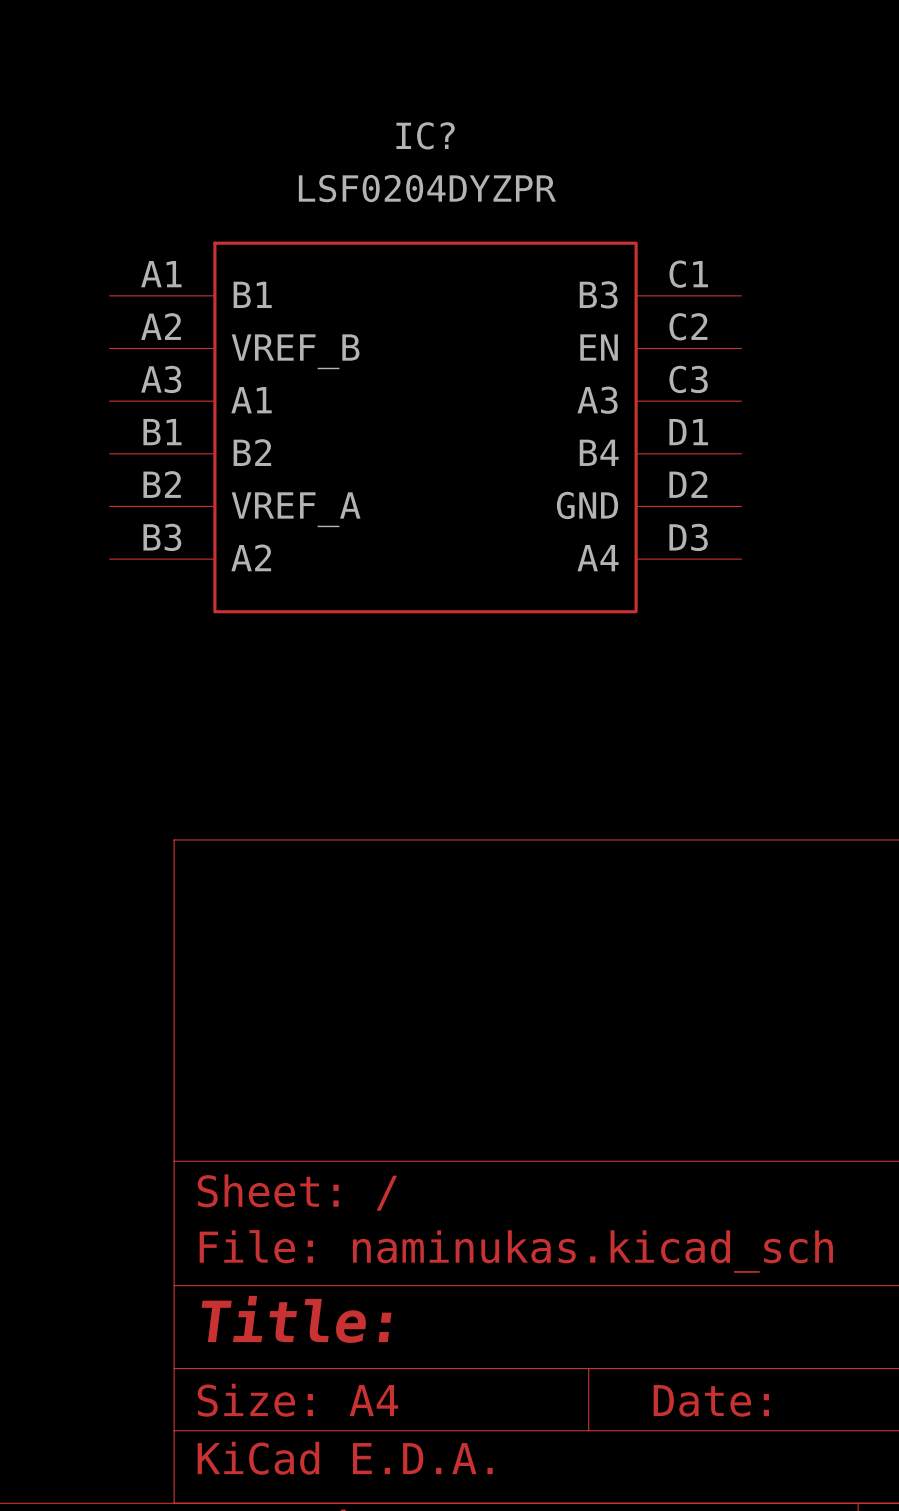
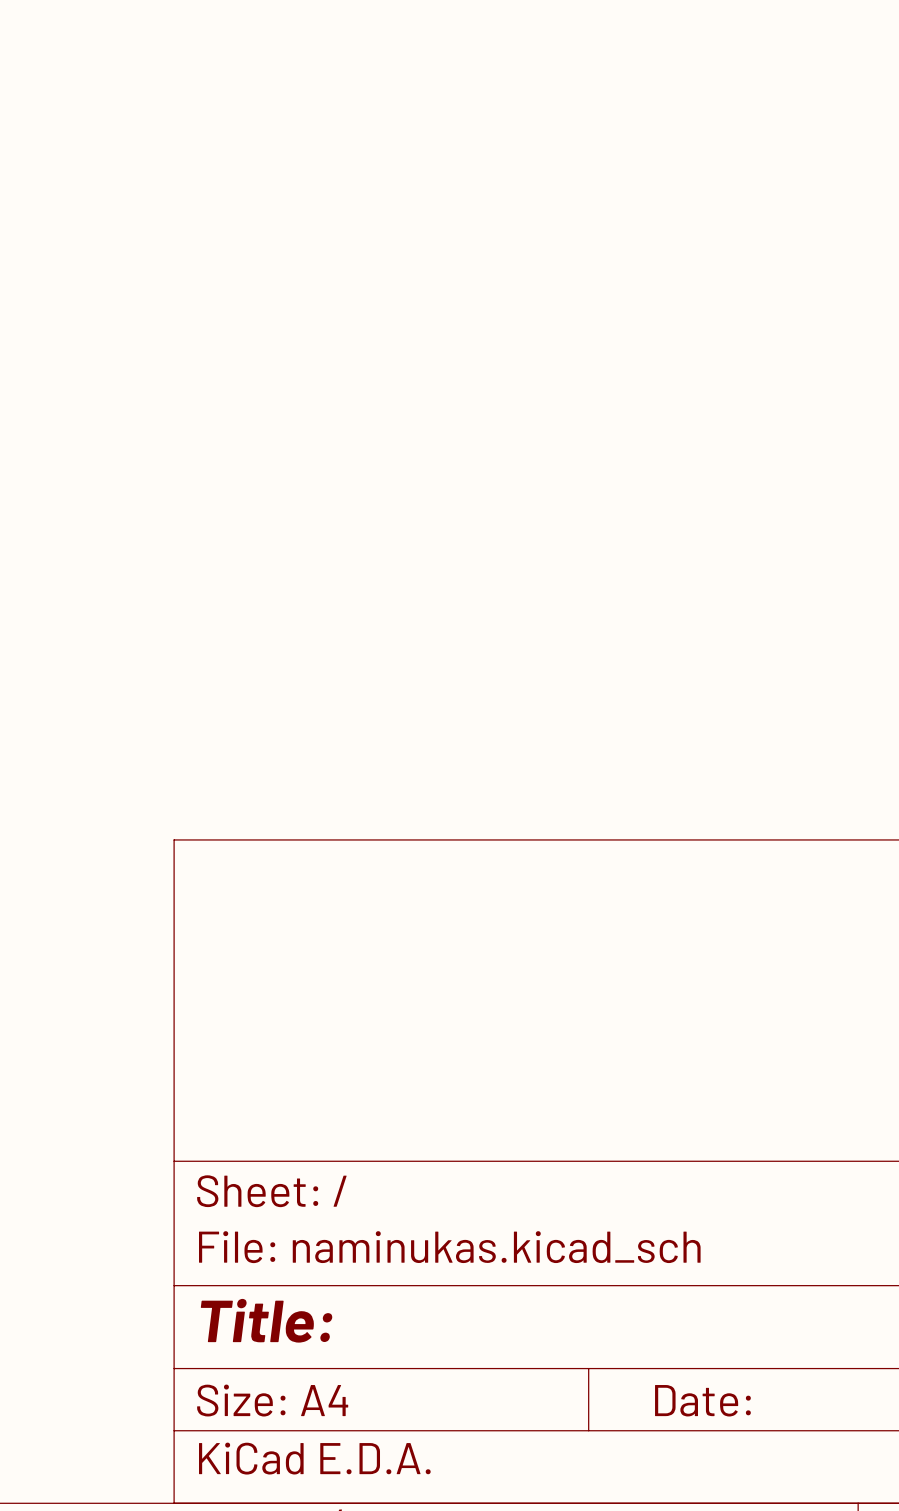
IC?: LSF0204DYZPR (425, 427) -> none

